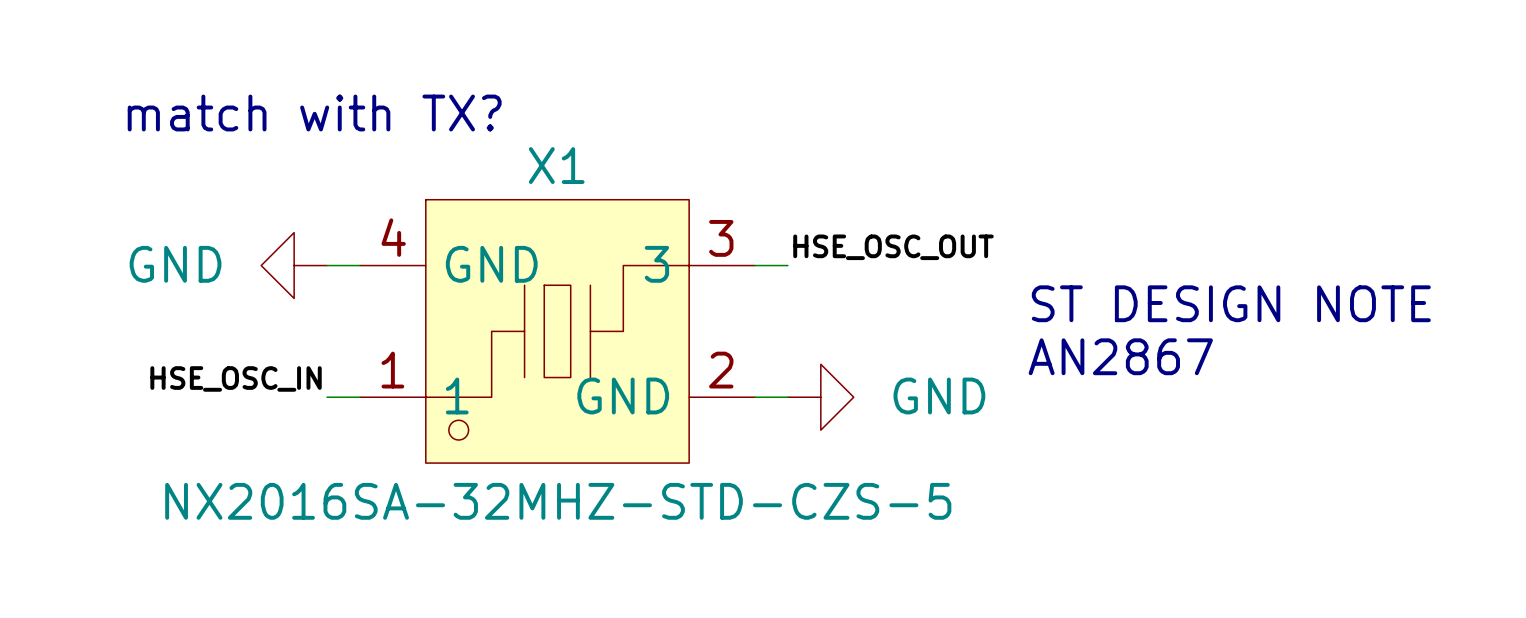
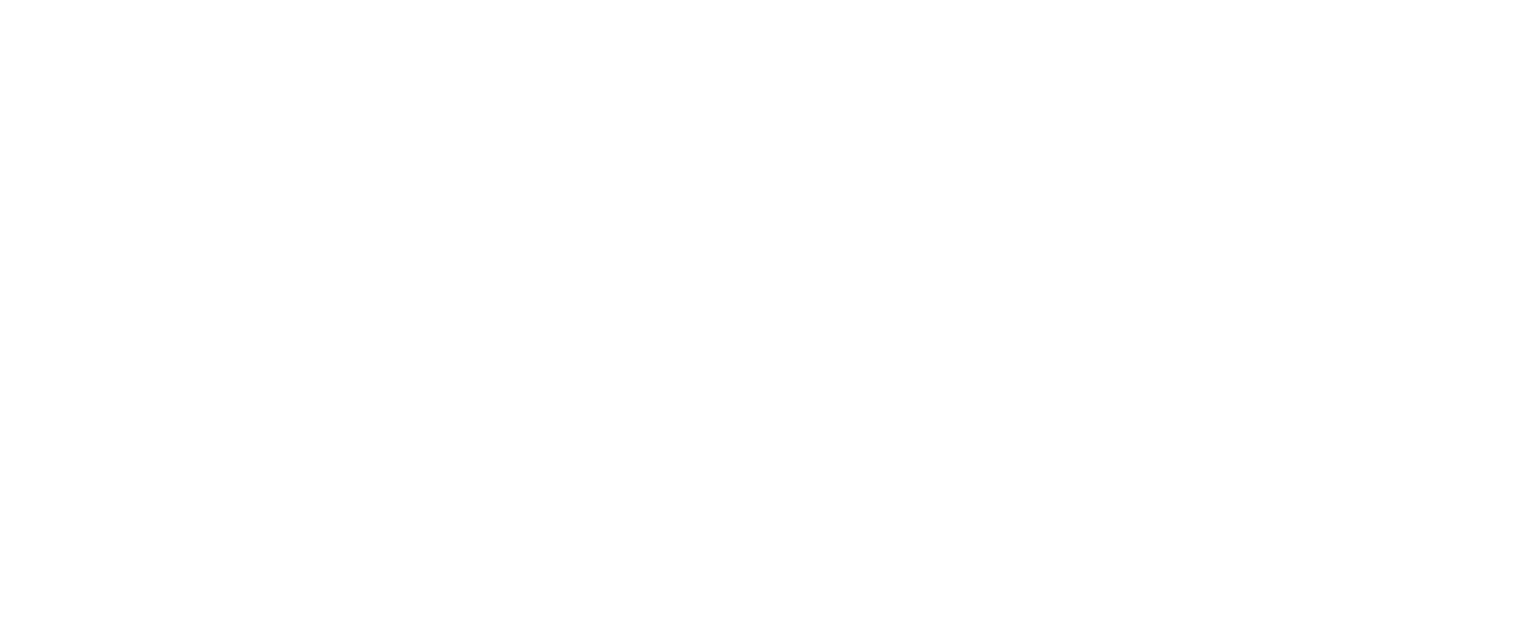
text: match with TX? (314, 113) -> none
label: HSE_OSC_OUT (893, 247) -> none
power symbol: GND (294, 265) -> none
wire: (327, 265) (359, 265) -> none
wire: (754, 265) (787, 265) -> none
text: ST DESIGN NOTE (1231, 303) -> none
X1: NX2016SA-32MHZ-STD-CZS-5 (557, 331) -> none
text: AN2867 (1120, 356) -> none
label: HSE_OSC_IN (236, 378) -> none
wire: (327, 397) (359, 397) -> none
wire: (754, 397) (787, 397) -> none
power symbol: GND (820, 397) -> none

